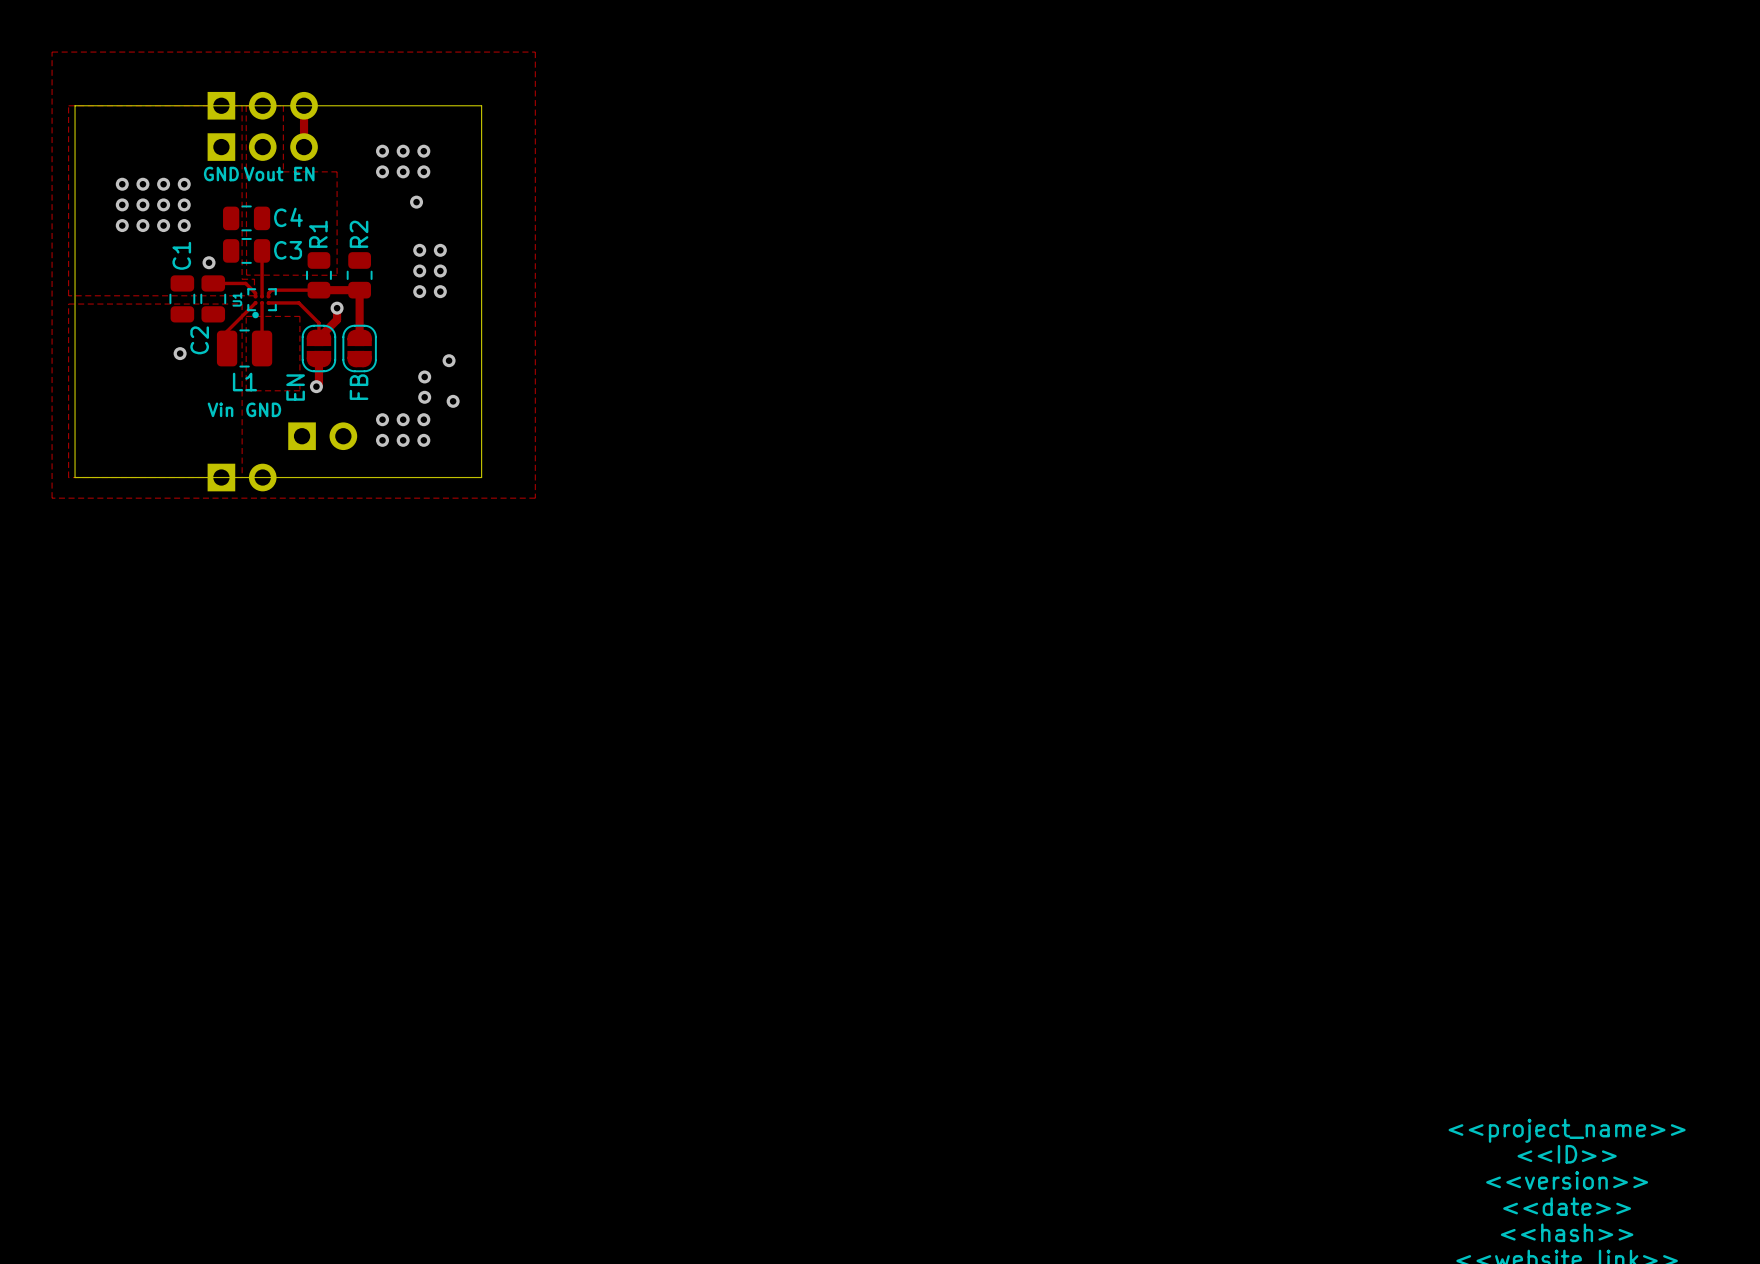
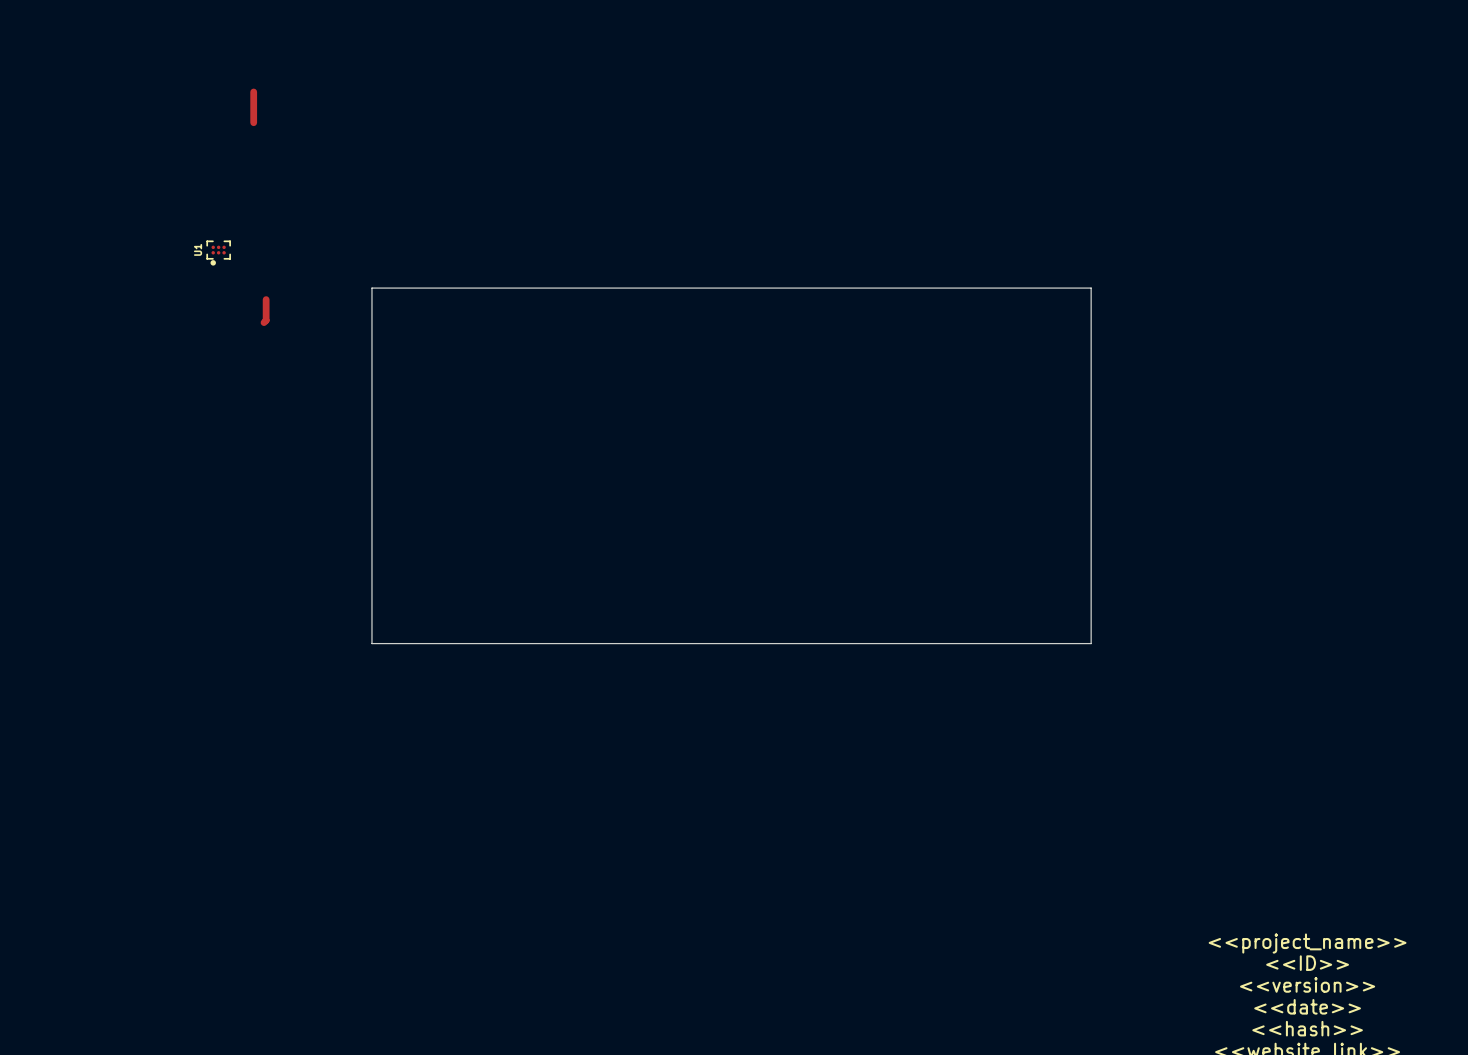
zone outline: (52, 52) (52, 498) (535, 498) (535, 52) (52, 52) -> none
zone outline: (68, 105) (68, 295) (254, 295) (254, 279) (242, 279) (242, 105) (68, 105) -> none
board edge: (75, 105) (481, 105) (481, 477) (75, 477) (75, 105) -> none
zone outline: (246, 105) (283, 105) (283, 171) (337, 171) (337, 275) (246, 275) (246, 105) -> none
part: (262, 105) -> none
part: (262, 147) -> none
via: (382, 151) -> none
via: (403, 151) -> none
via: (423, 151) -> none
via: (382, 171) -> none
via: (403, 171) -> none
via: (423, 171) -> none
text: GND (221, 174) -> none
text: Vout (263, 174) -> none
text: EN (304, 174) -> none
via: (122, 184) -> none
via: (142, 184) -> none
via: (163, 184) -> none
via: (184, 184) -> none
via: (416, 202) -> none
via: (122, 204) -> none
via: (142, 204) -> none
via: (163, 204) -> none
via: (184, 204) -> none
C4: (246, 218) -> none
via: (122, 225) -> none
via: (142, 225) -> none
via: (163, 225) -> none
via: (184, 225) -> none
C3: (246, 250) -> none
track: (262, 250) (262, 296) -> none
via: (419, 250) -> none
via: (440, 250) -> none
via: (209, 262) -> none
via: (419, 270) -> none
via: (440, 270) -> none
R1: (318, 275) -> none
R2: (359, 275) -> none
track: (213, 283) (245, 283) (255, 293) (255, 296) -> none
via: (419, 291) -> none
via: (440, 291) -> none
track: (268, 296) (271, 290) (359, 290) (359, 337) -> none
C1: (182, 298) -> none
C2: (213, 298) -> none
track: (255, 302) (227, 331) (227, 348) -> none
track: (262, 302) (262, 348) -> none
track: (268, 302) (298, 302) (318, 323) (318, 337) -> none
zone outline: (68, 304) (68, 477) (242, 477) (242, 304) (68, 304) -> none
track: (337, 308) (337, 319) (318, 337) -> none
via: (337, 308) -> none
zone outline: (246, 316) (246, 390) (299, 390) (299, 316) (246, 316) -> none
board edge: none -> (371, 288) (1091, 288) (1091, 643) (371, 643) (371, 288)
L1: (244, 348) -> none
part: (318, 348) -> none
part: (359, 348) -> none
via: (180, 353) -> none
via: (449, 360) -> none
via: (424, 376) -> none
via: (316, 386) -> none
via: (424, 397) -> none
via: (453, 401) -> none
text: Vin (220, 409) -> none
text: GND (263, 409) -> none
via: (382, 419) -> none
via: (403, 419) -> none
via: (423, 419) -> none
part: (322, 436) -> none
via: (382, 440) -> none
via: (403, 440) -> none
via: (423, 440) -> none
part: (242, 477) -> none

